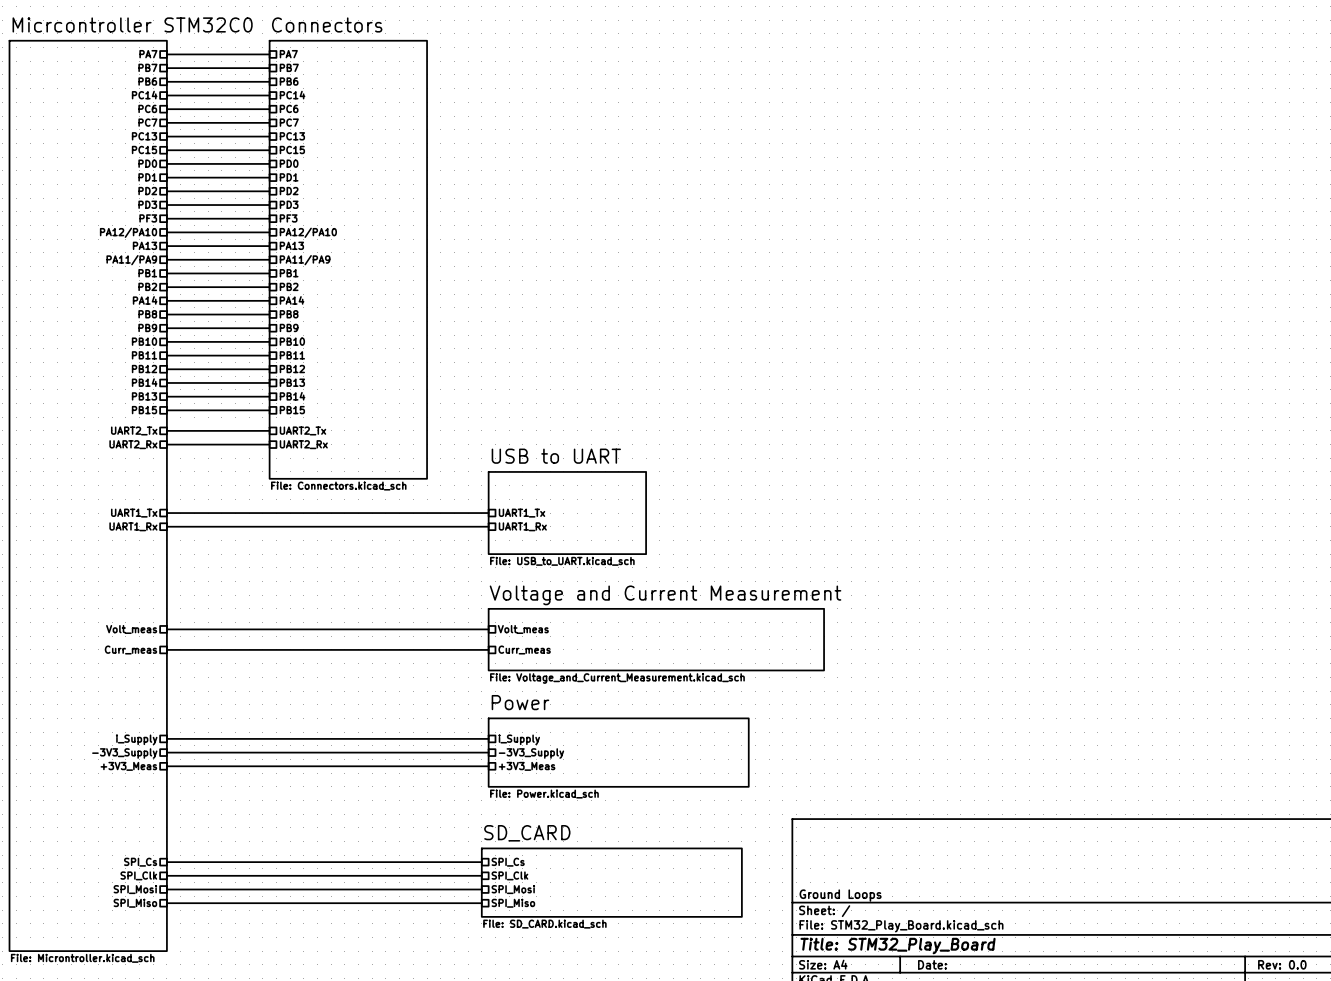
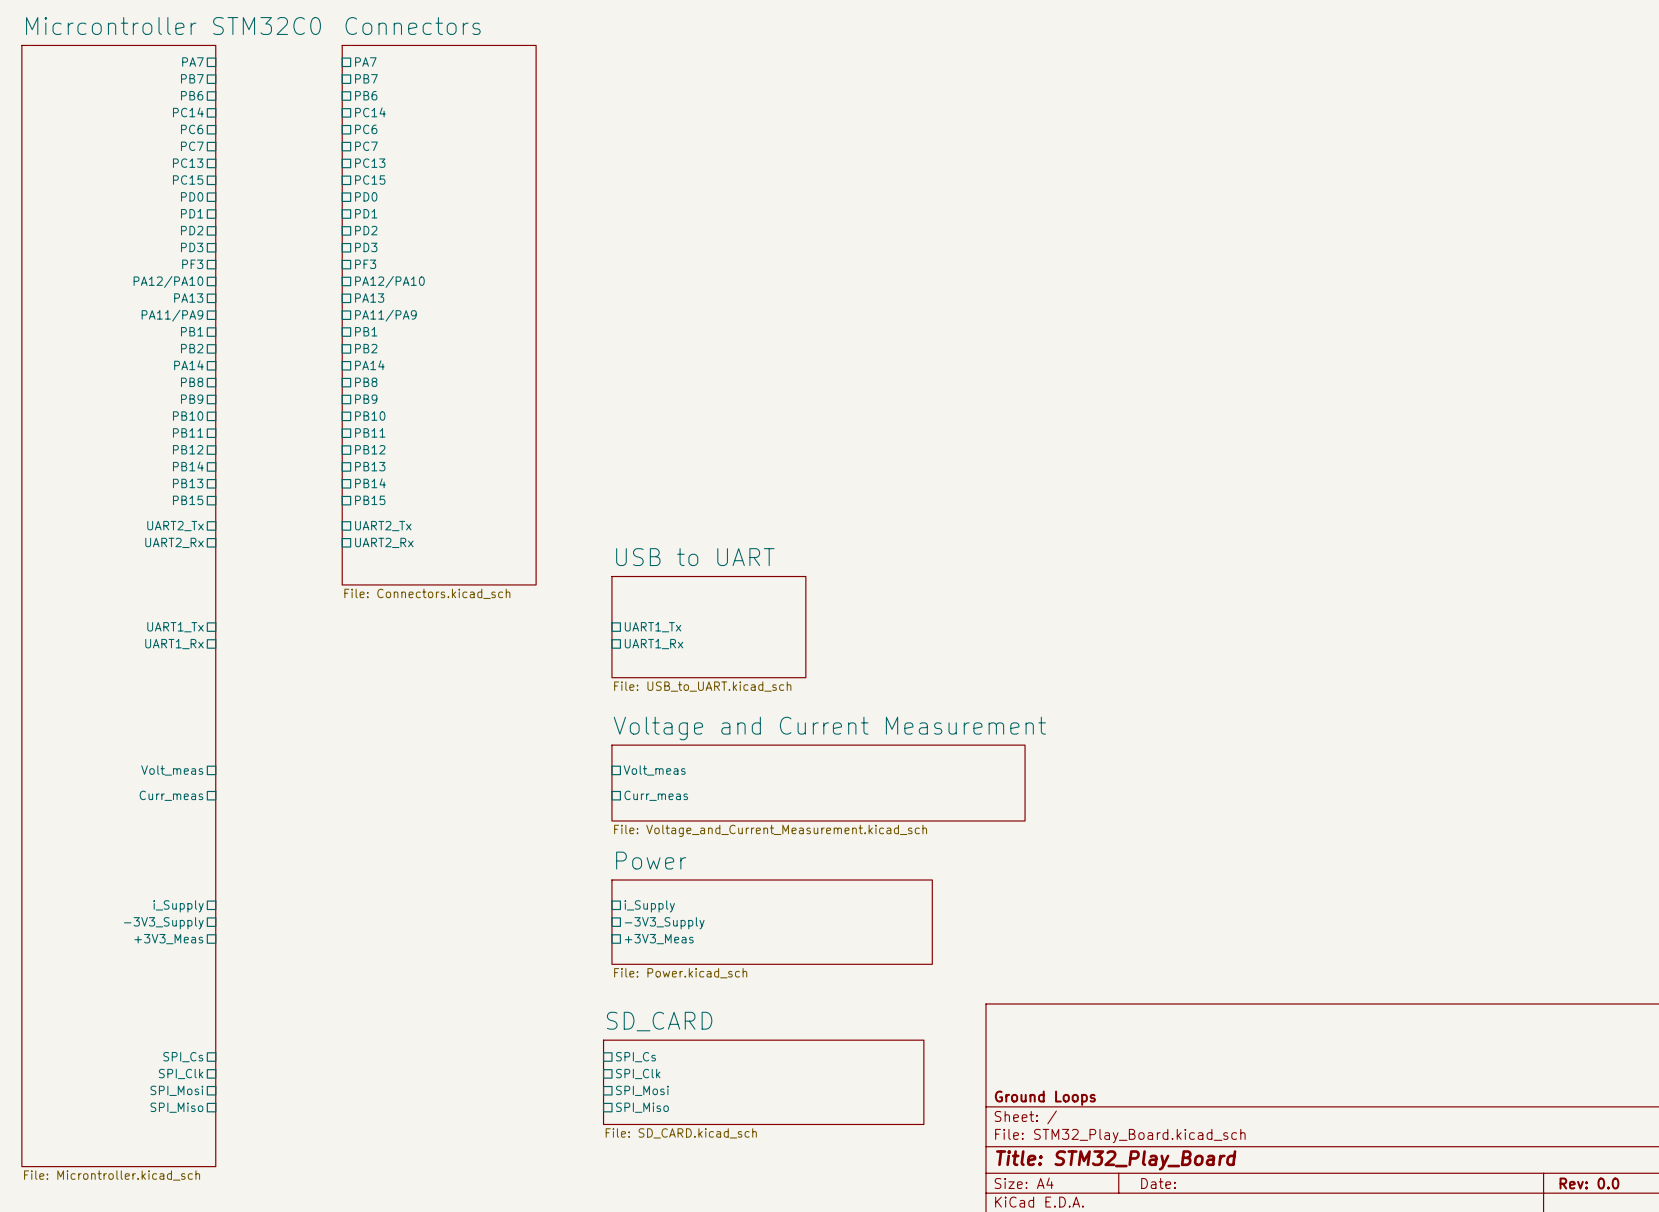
wire: (166, 54) (269, 54) -> none
wire: (166, 68) (269, 68) -> none
wire: (166, 81) (269, 81) -> none
wire: (166, 95) (269, 95) -> none
wire: (166, 109) (269, 109) -> none
wire: (166, 122) (269, 122) -> none
wire: (166, 136) (269, 136) -> none
wire: (166, 150) (269, 150) -> none
wire: (166, 163) (269, 163) -> none
wire: (166, 177) (269, 177) -> none
wire: (166, 191) (269, 191) -> none
wire: (166, 205) (269, 205) -> none
wire: (166, 218) (269, 218) -> none
wire: (166, 232) (269, 232) -> none
wire: (166, 246) (269, 246) -> none
wire: (166, 259) (269, 259) -> none
wire: (166, 273) (269, 273) -> none
wire: (166, 287) (269, 287) -> none
wire: (166, 300) (269, 300) -> none
wire: (166, 314) (269, 314) -> none
wire: (166, 328) (269, 328) -> none
wire: (166, 341) (269, 341) -> none
wire: (166, 355) (269, 355) -> none
wire: (166, 369) (269, 369) -> none
wire: (166, 382) (269, 382) -> none
wire: (166, 396) (269, 396) -> none
wire: (166, 410) (269, 410) -> none
wire: (166, 430) (269, 430) -> none
wire: (166, 444) (269, 444) -> none
wire: (166, 513) (488, 513) -> none
wire: (166, 526) (488, 526) -> none
wire: (166, 629) (488, 629) -> none
wire: (166, 649) (488, 649) -> none
wire: (166, 738) (488, 738) -> none
wire: (166, 752) (488, 752) -> none
wire: (166, 766) (488, 766) -> none
wire: (166, 862) (481, 862) -> none
wire: (166, 875) (481, 875) -> none
wire: (166, 889) (481, 889) -> none
wire: (166, 903) (481, 903) -> none

